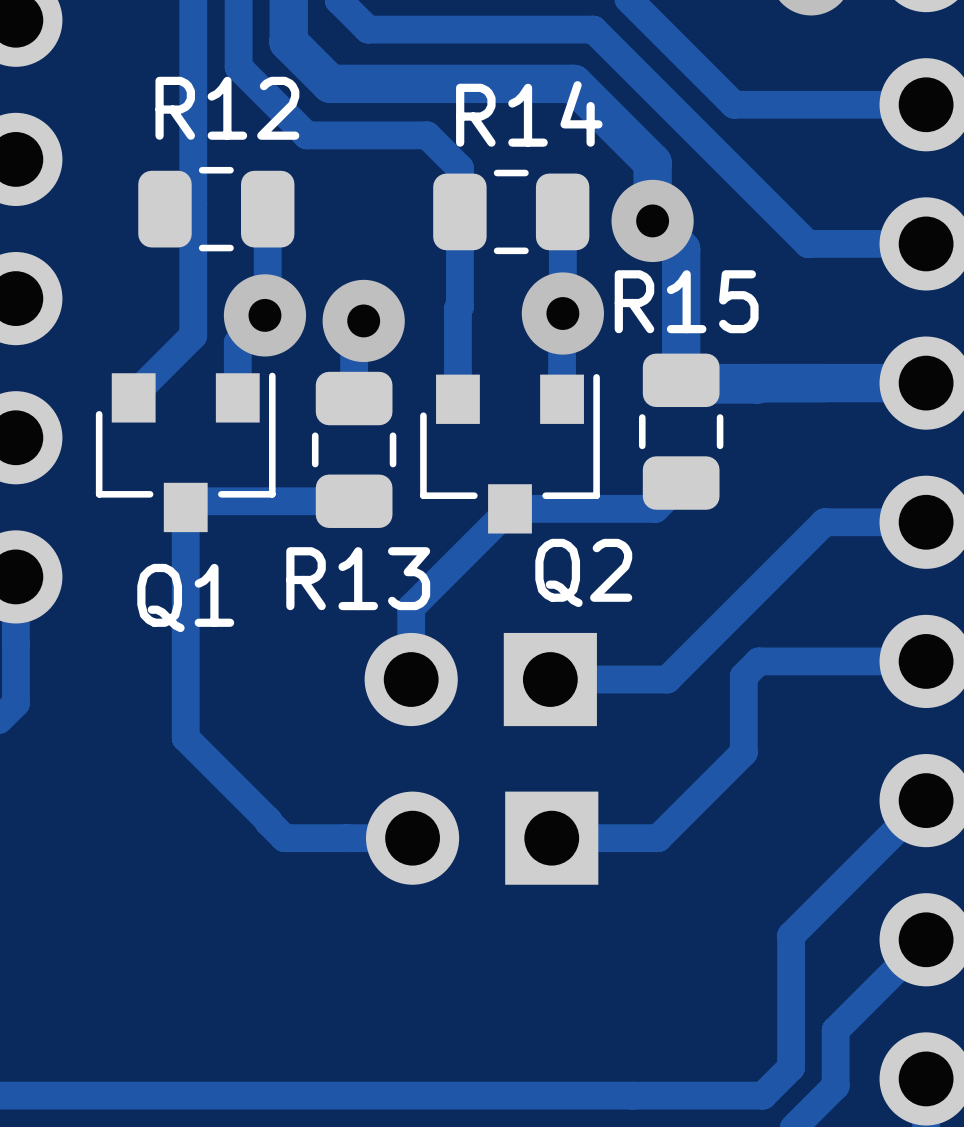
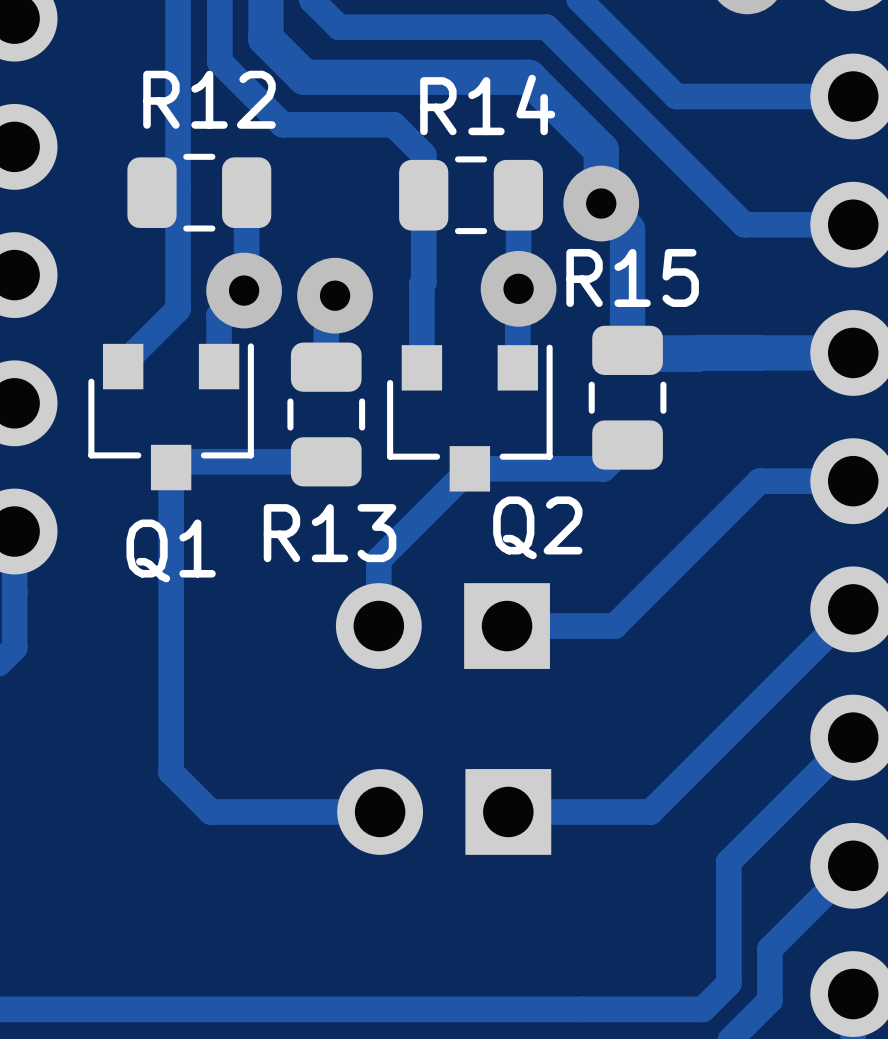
track: (926, 661) (758, 661) (743, 676) (743, 752) (658, 838) (551, 838) -> (853, 609) (650, 811) (508, 811)
track: (185, 737) (284, 838) (412, 838) -> (171, 679) (171, 772) (210, 811) (380, 811)
part position: (482, 838) -> (444, 811)

